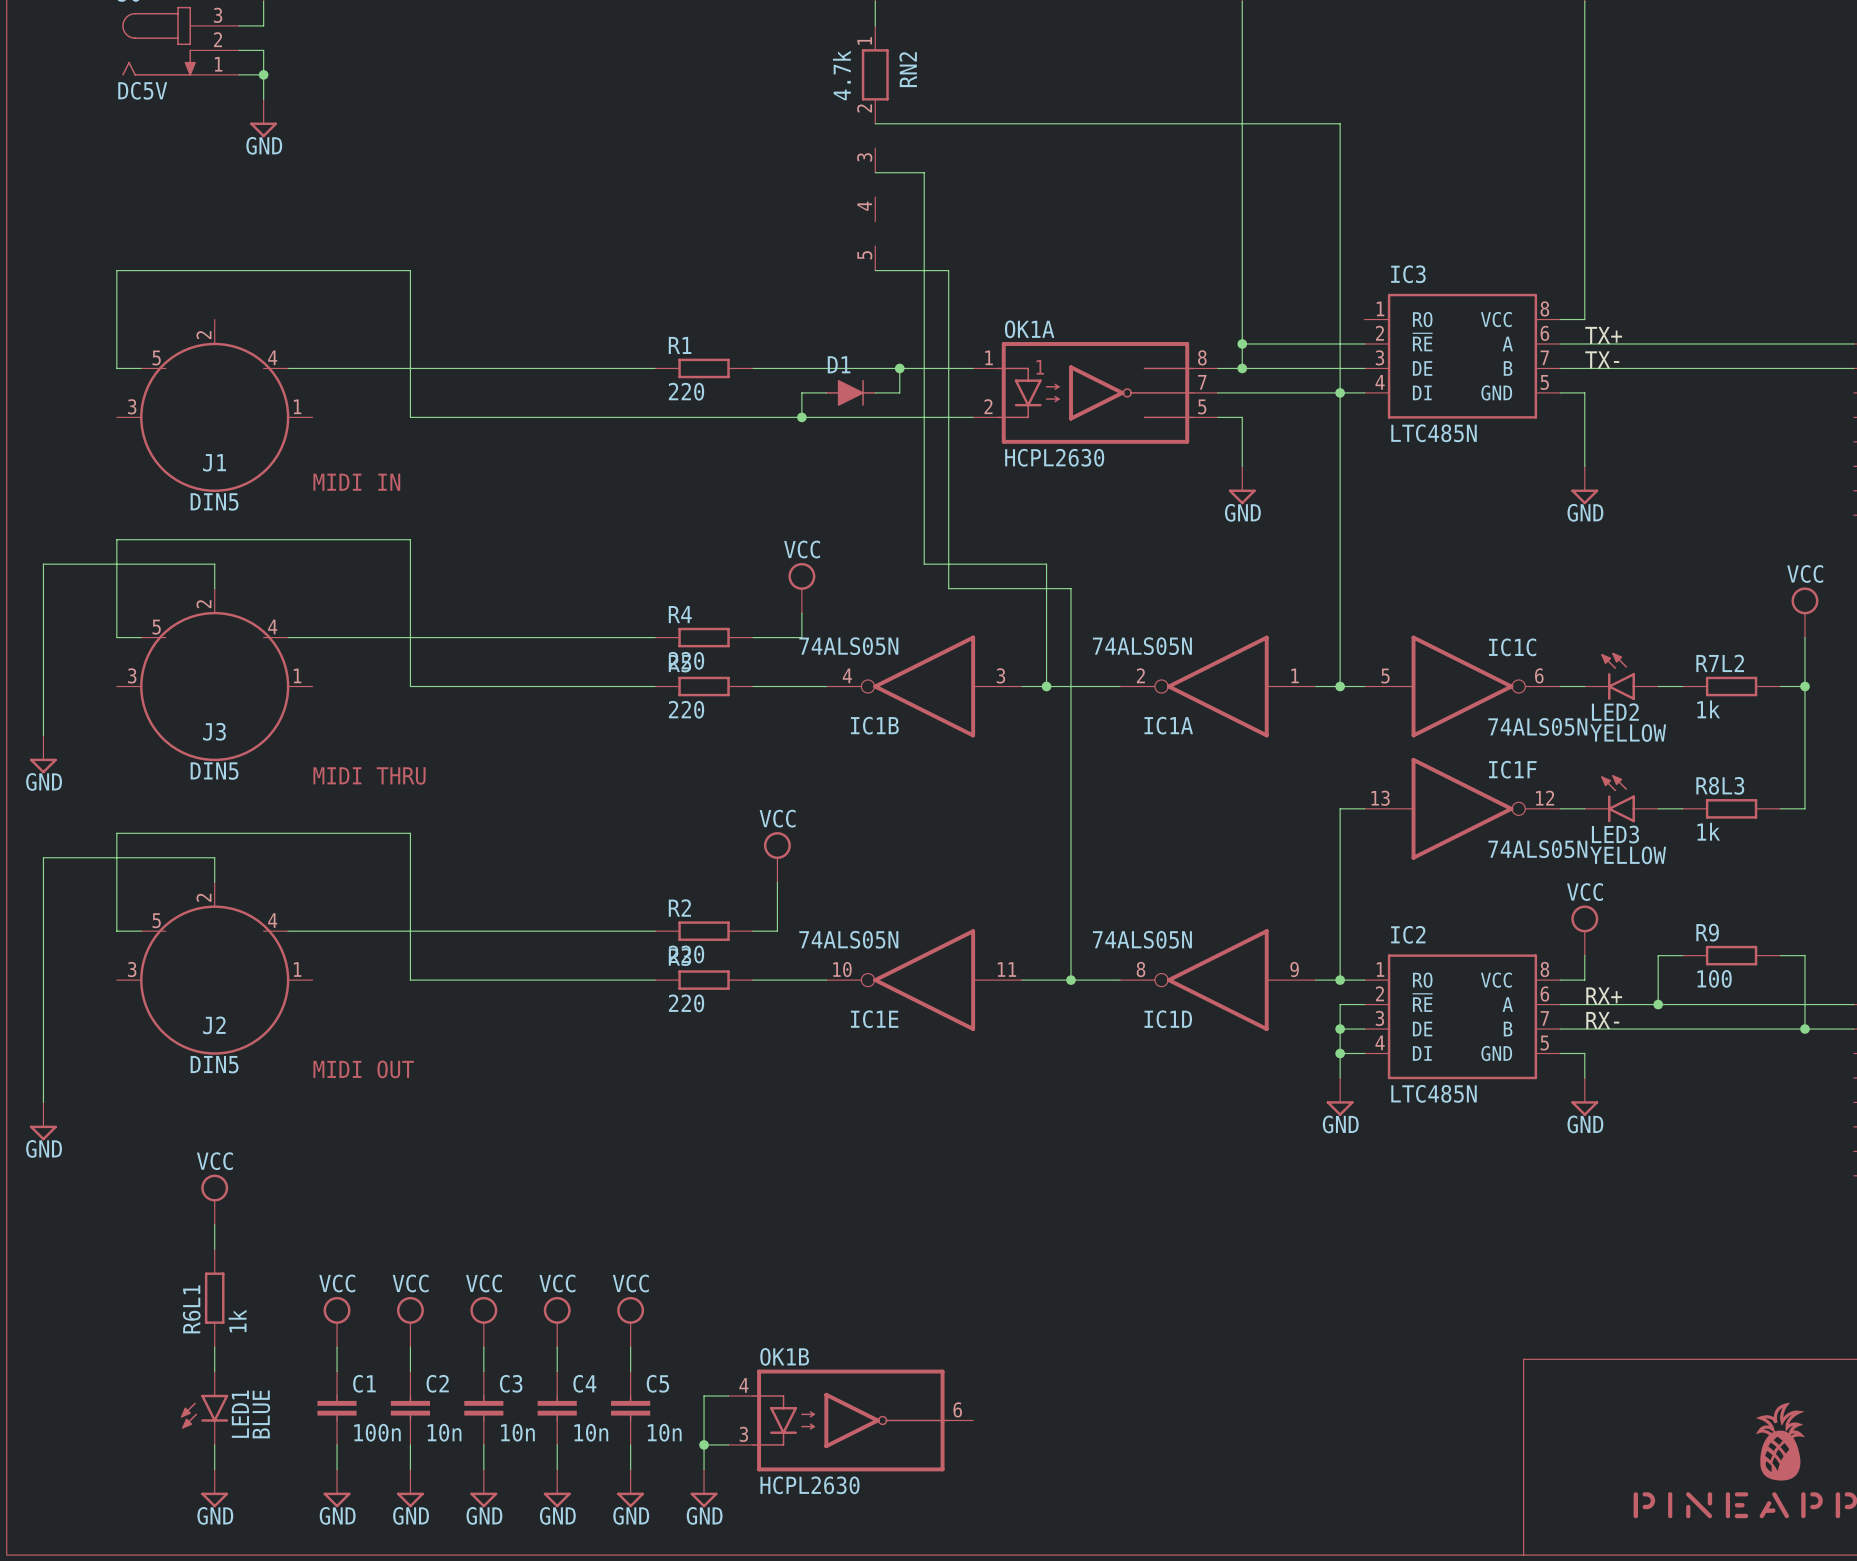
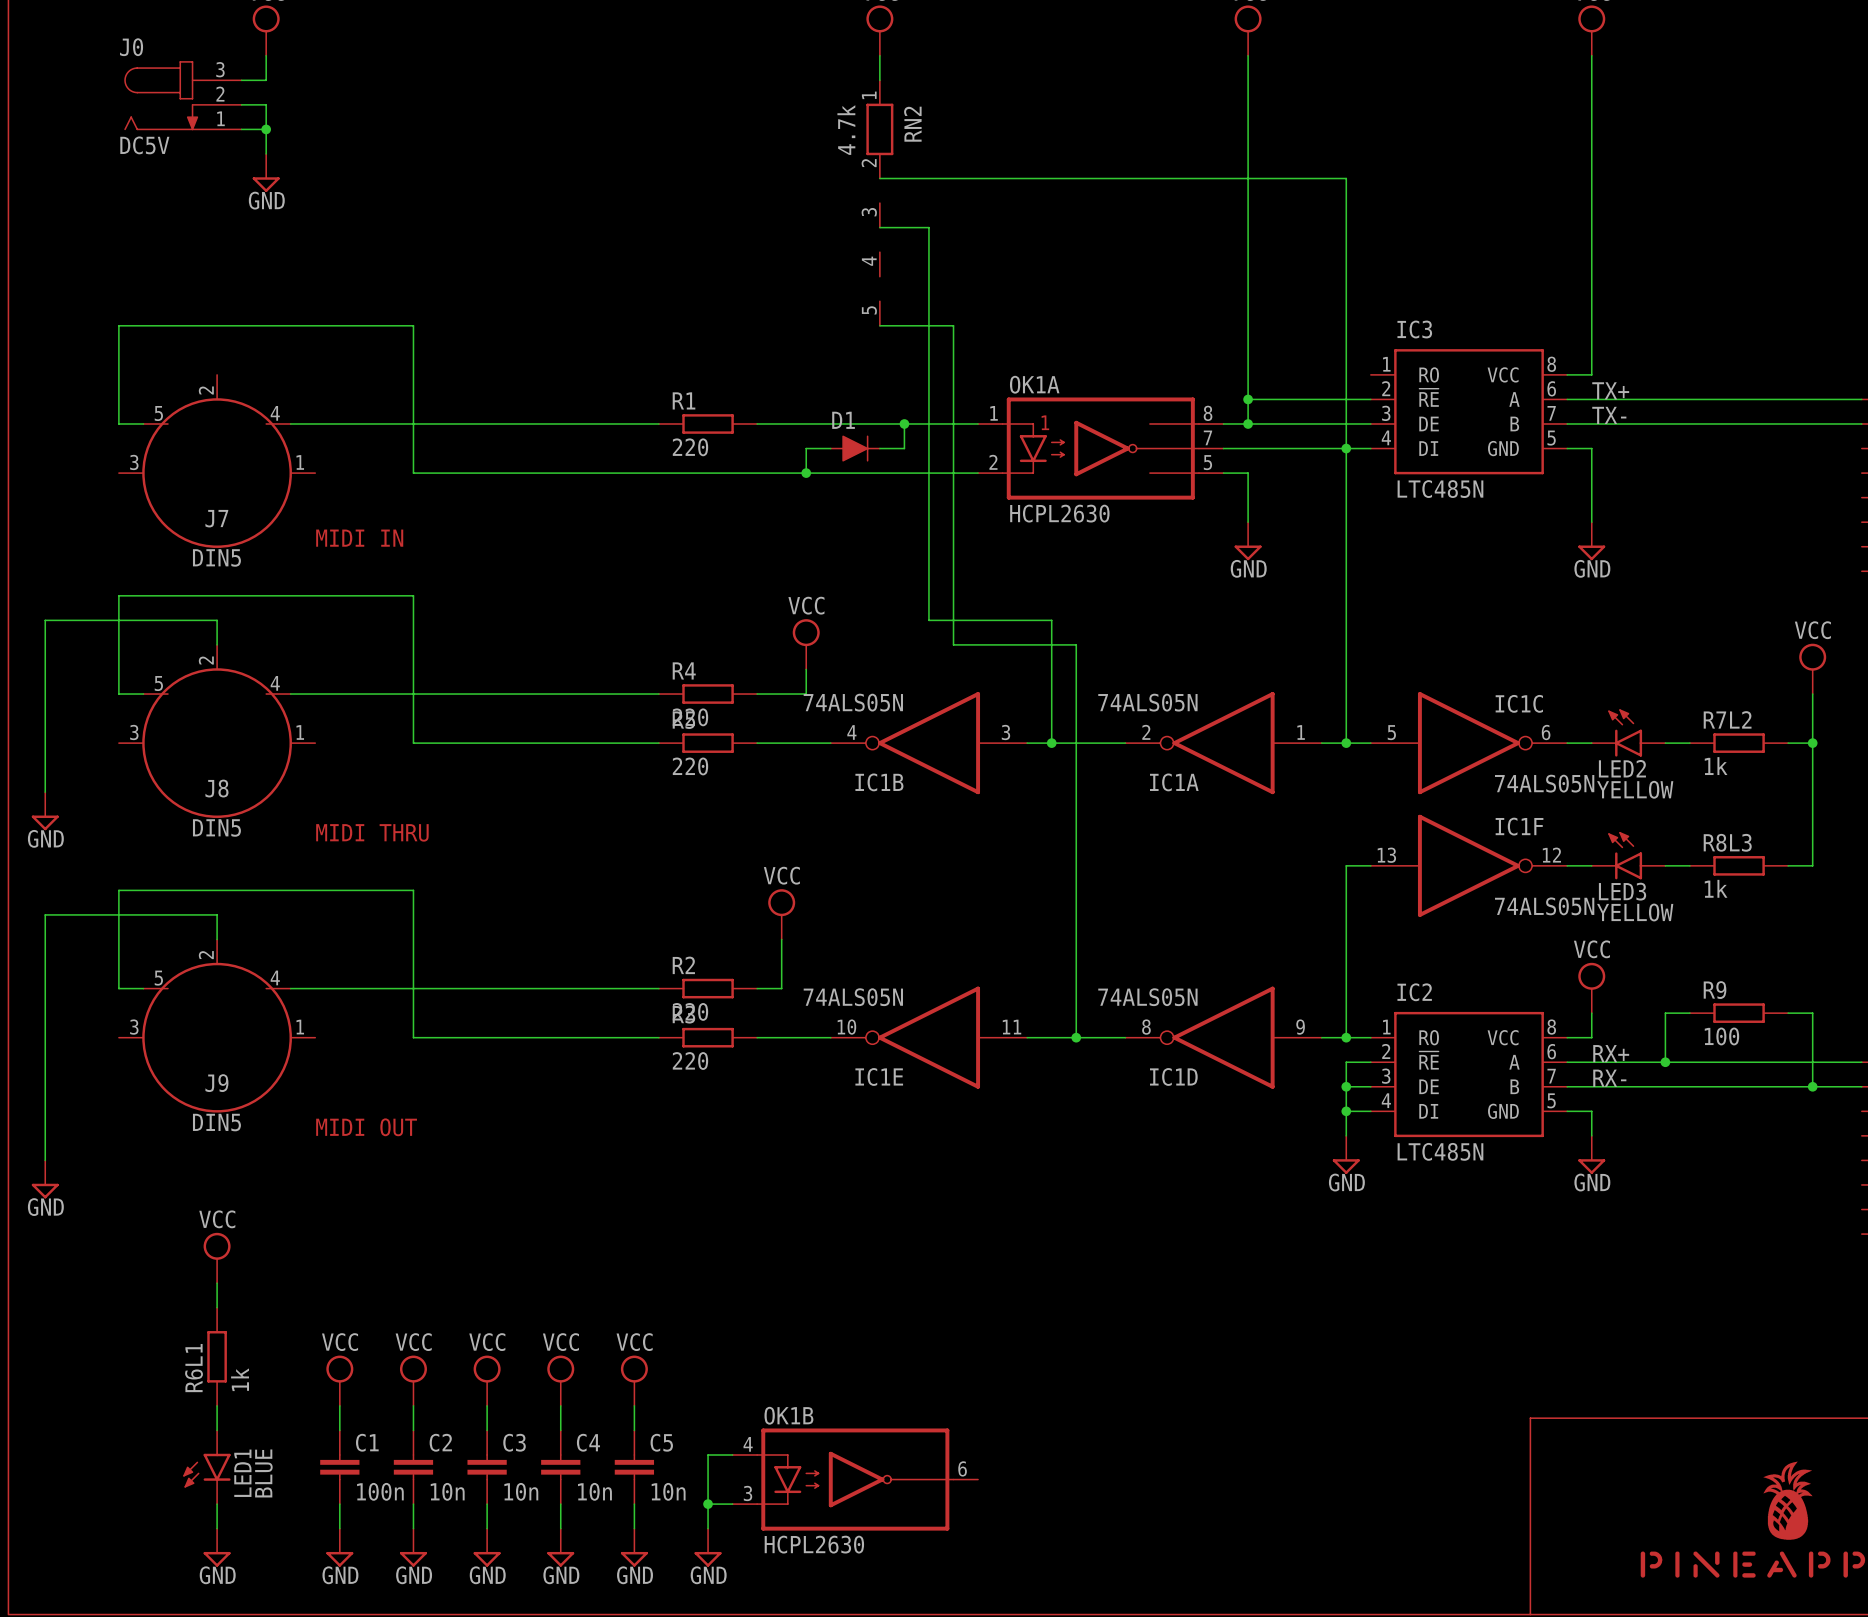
J1 name: J1 (214, 462) -> J7 (216, 518)
J3 name: J3 (214, 731) -> J8 (216, 788)
J2 name: J2 (214, 1025) -> J9 (216, 1083)

